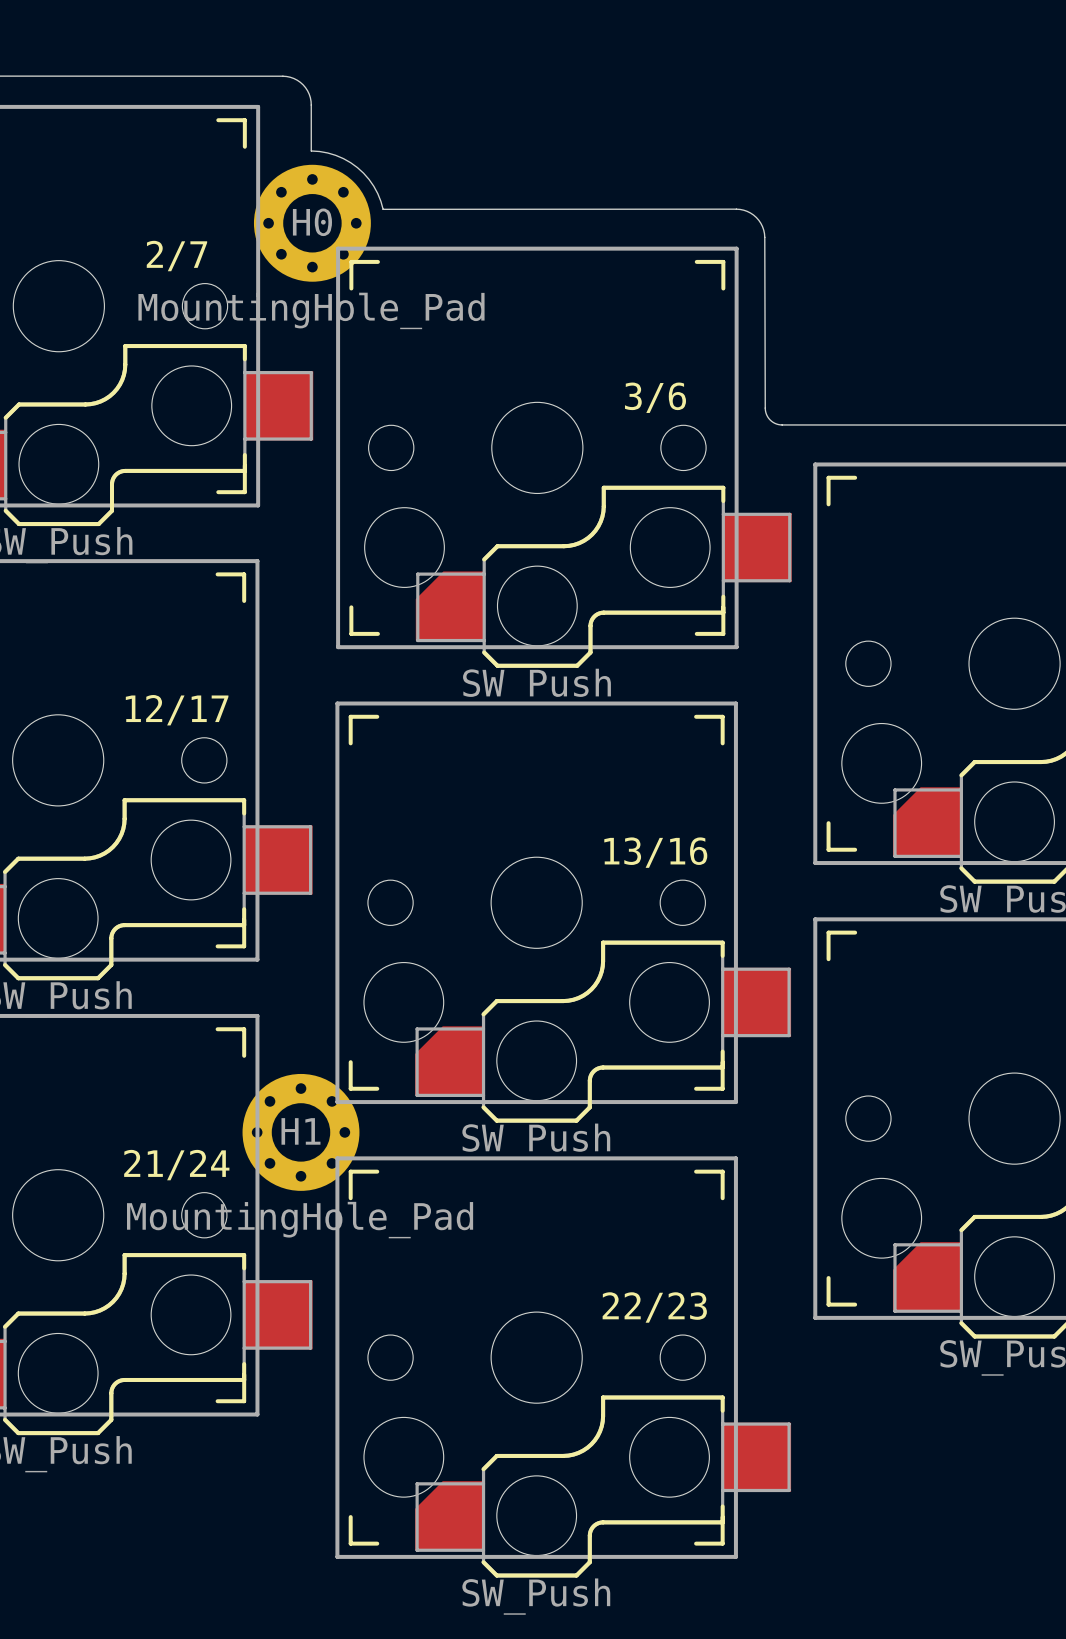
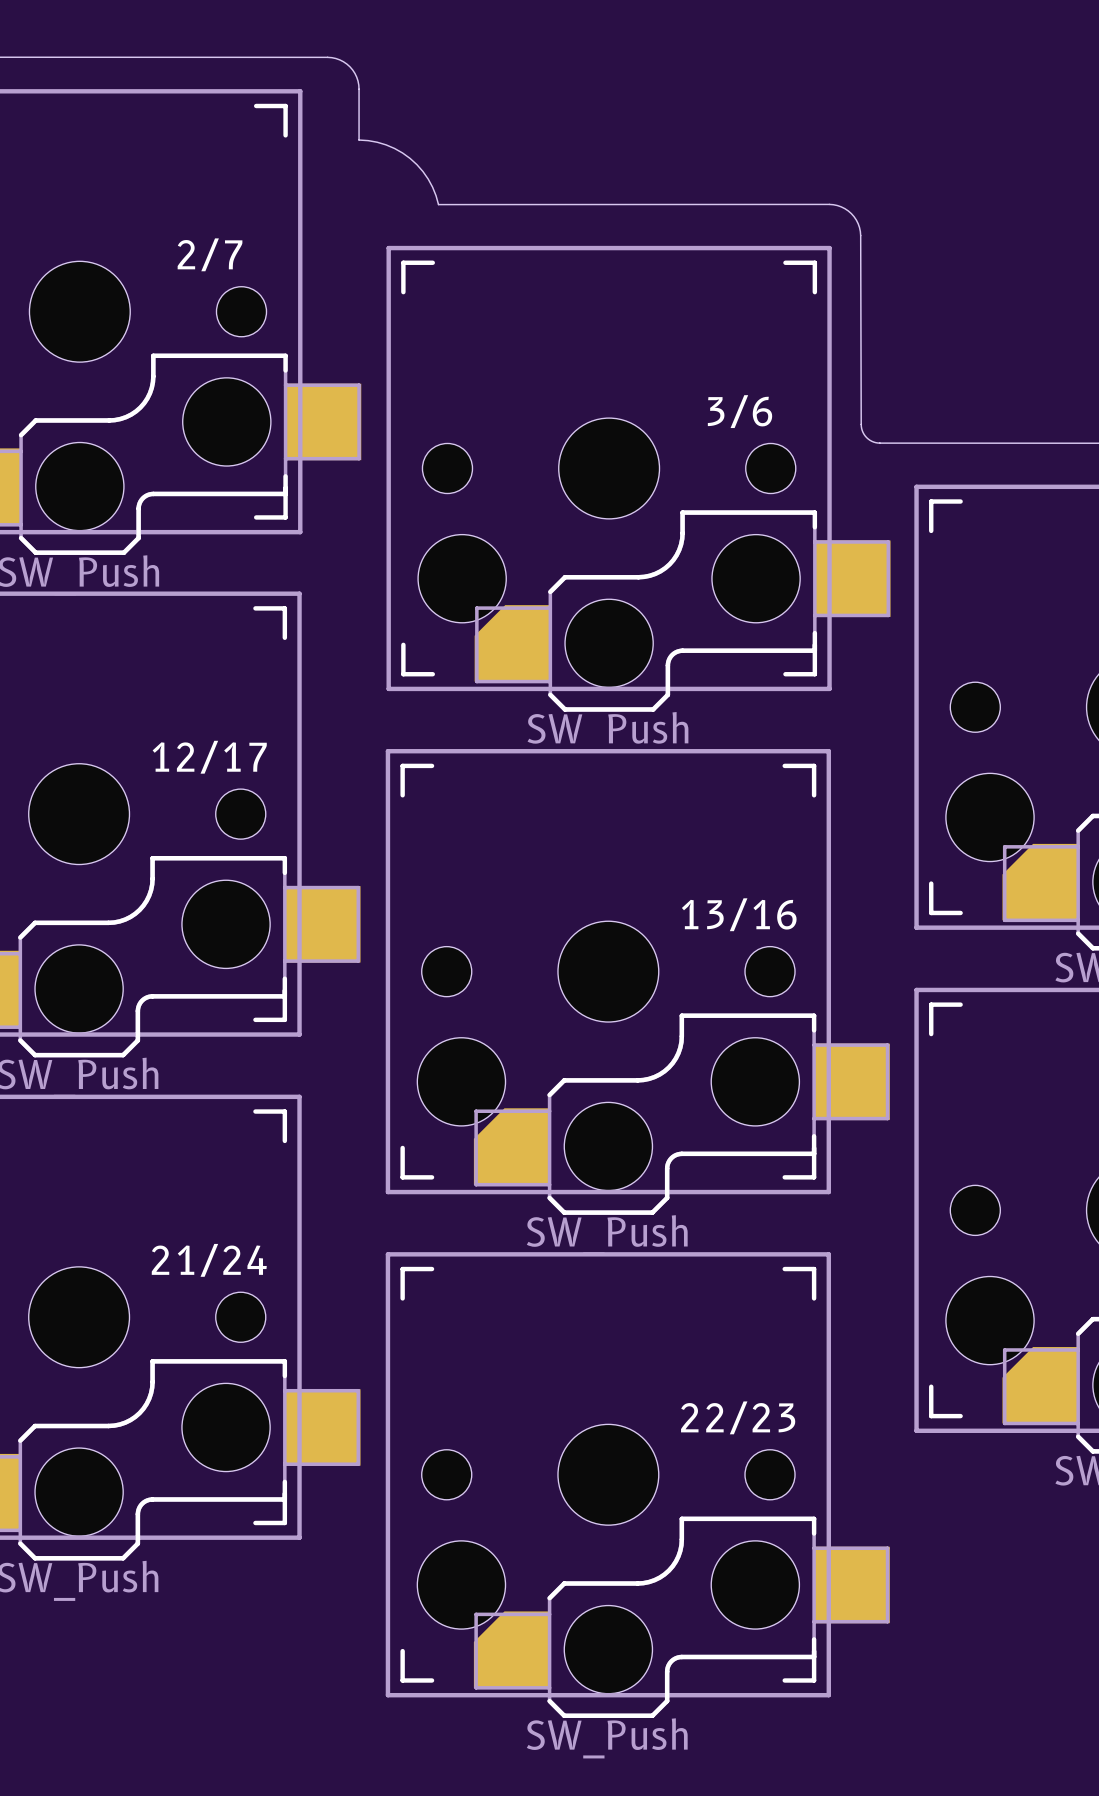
H0: MountingHole_Pad (312, 223) -> none
H1: MountingHole_Pad (300, 1132) -> none

